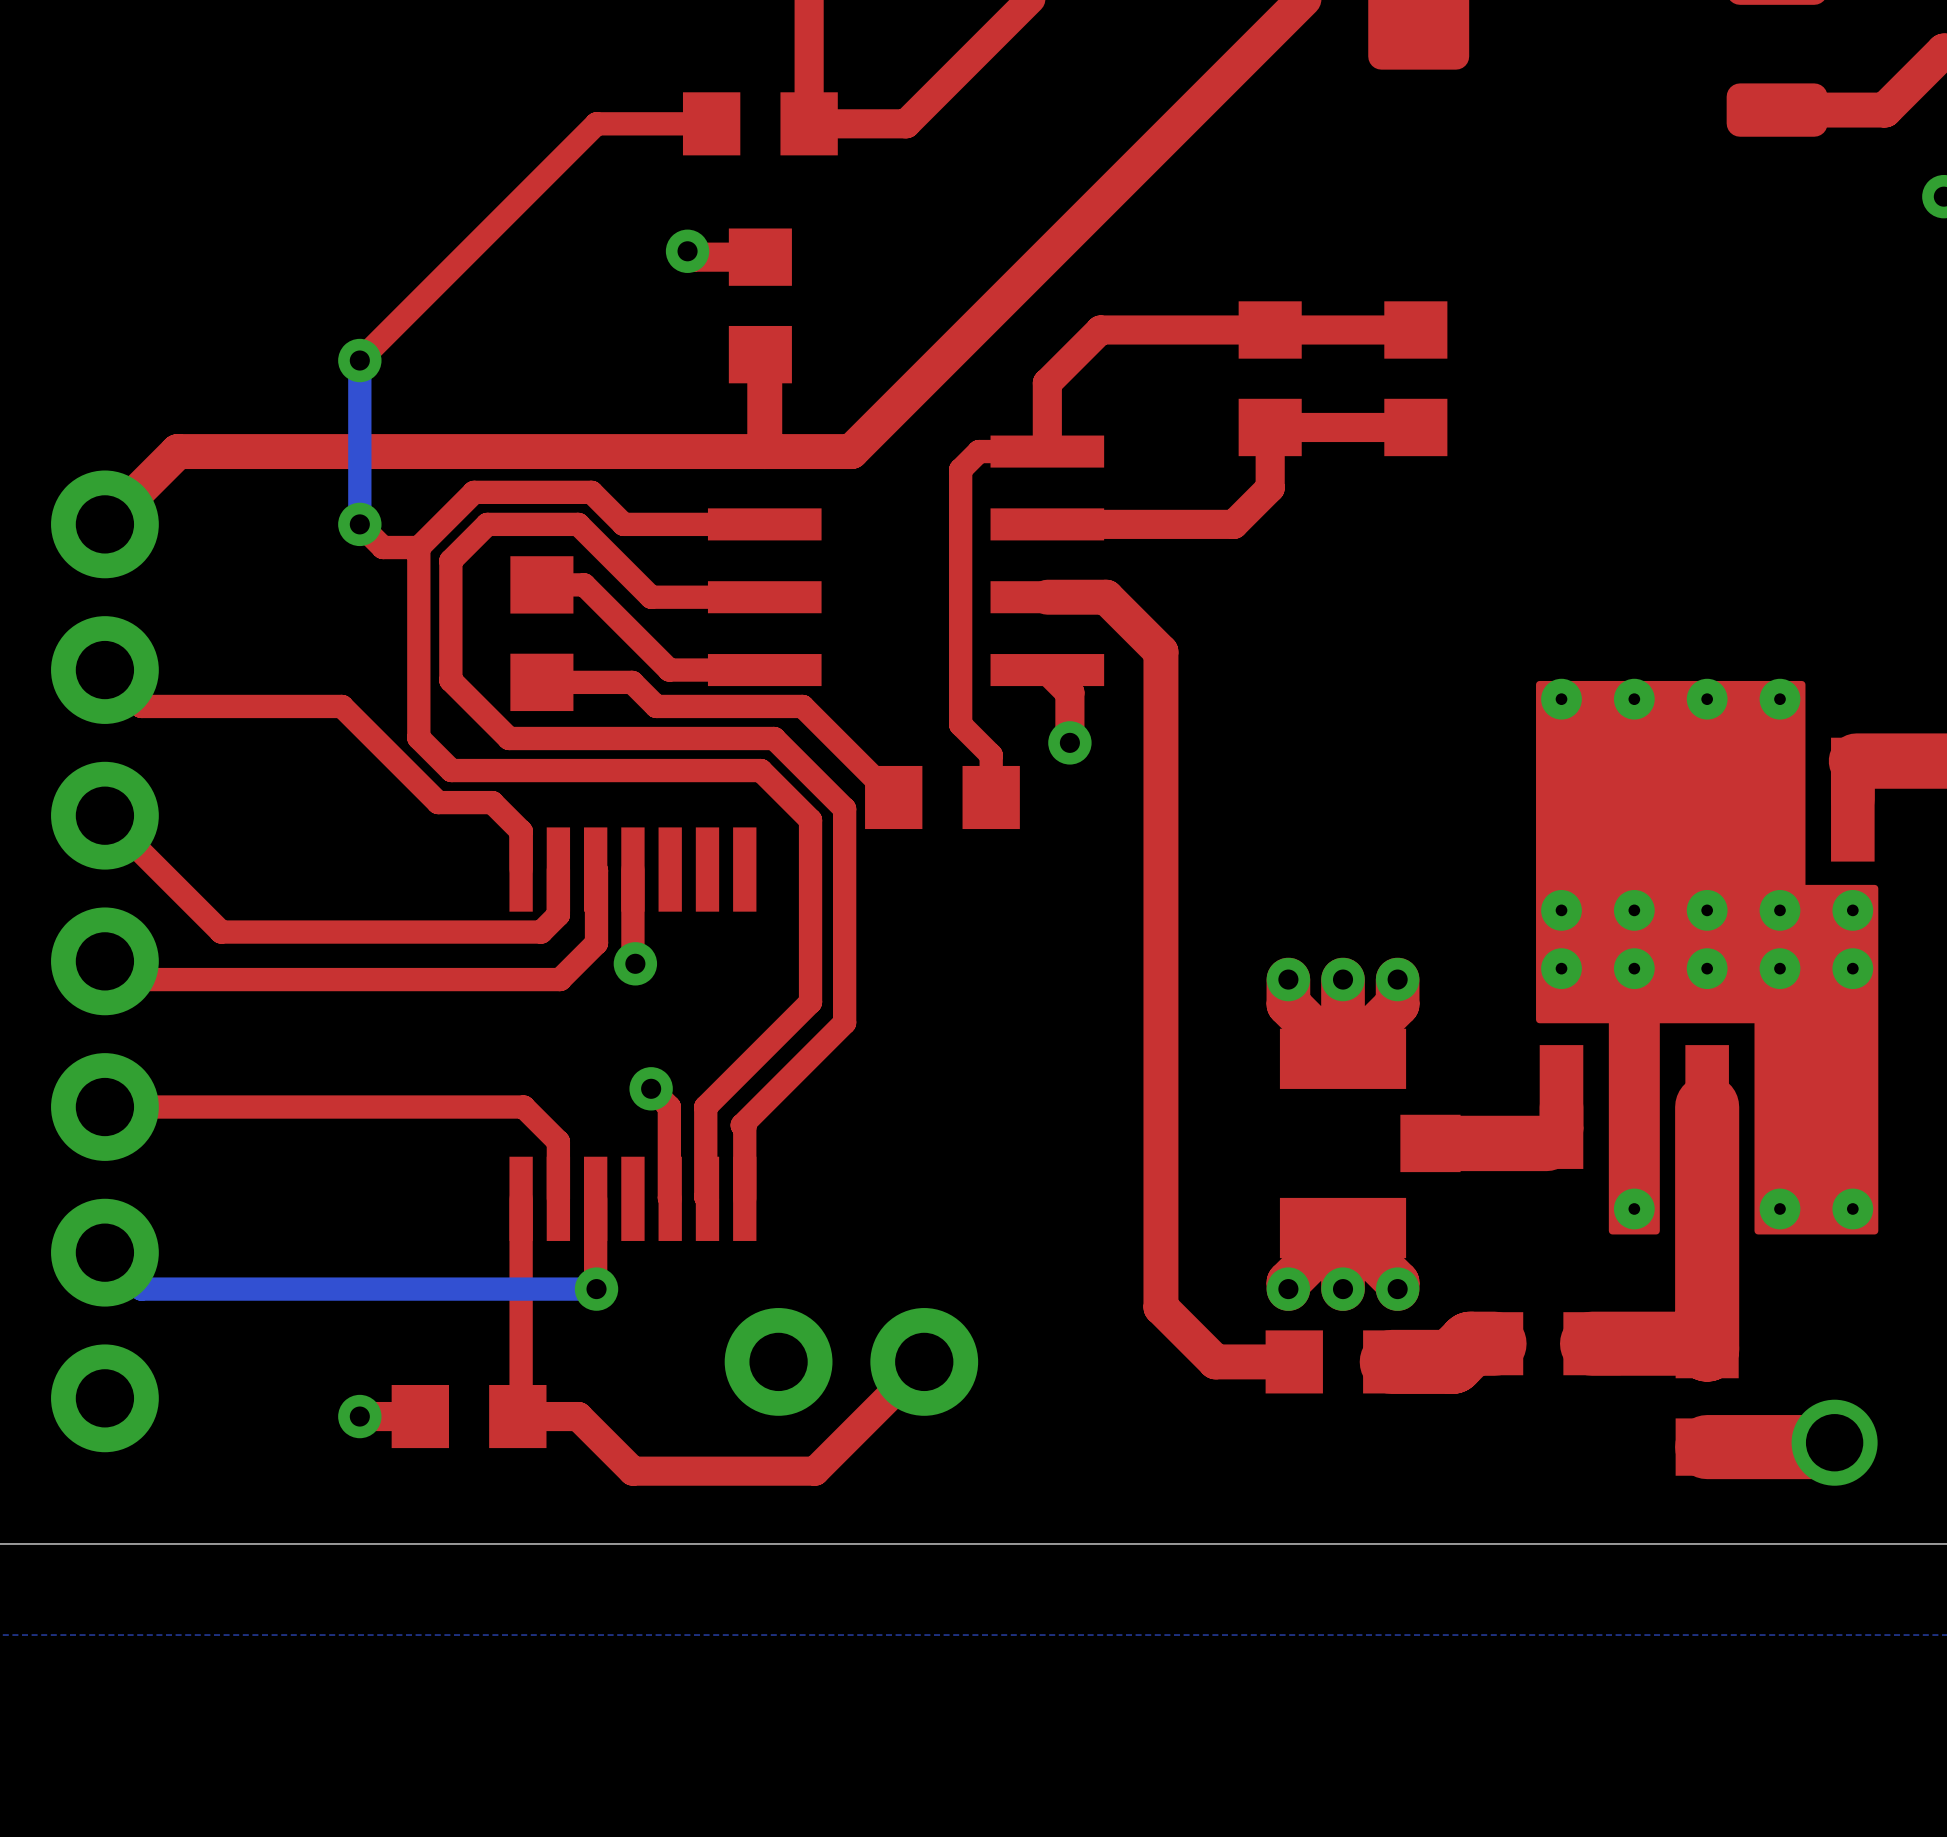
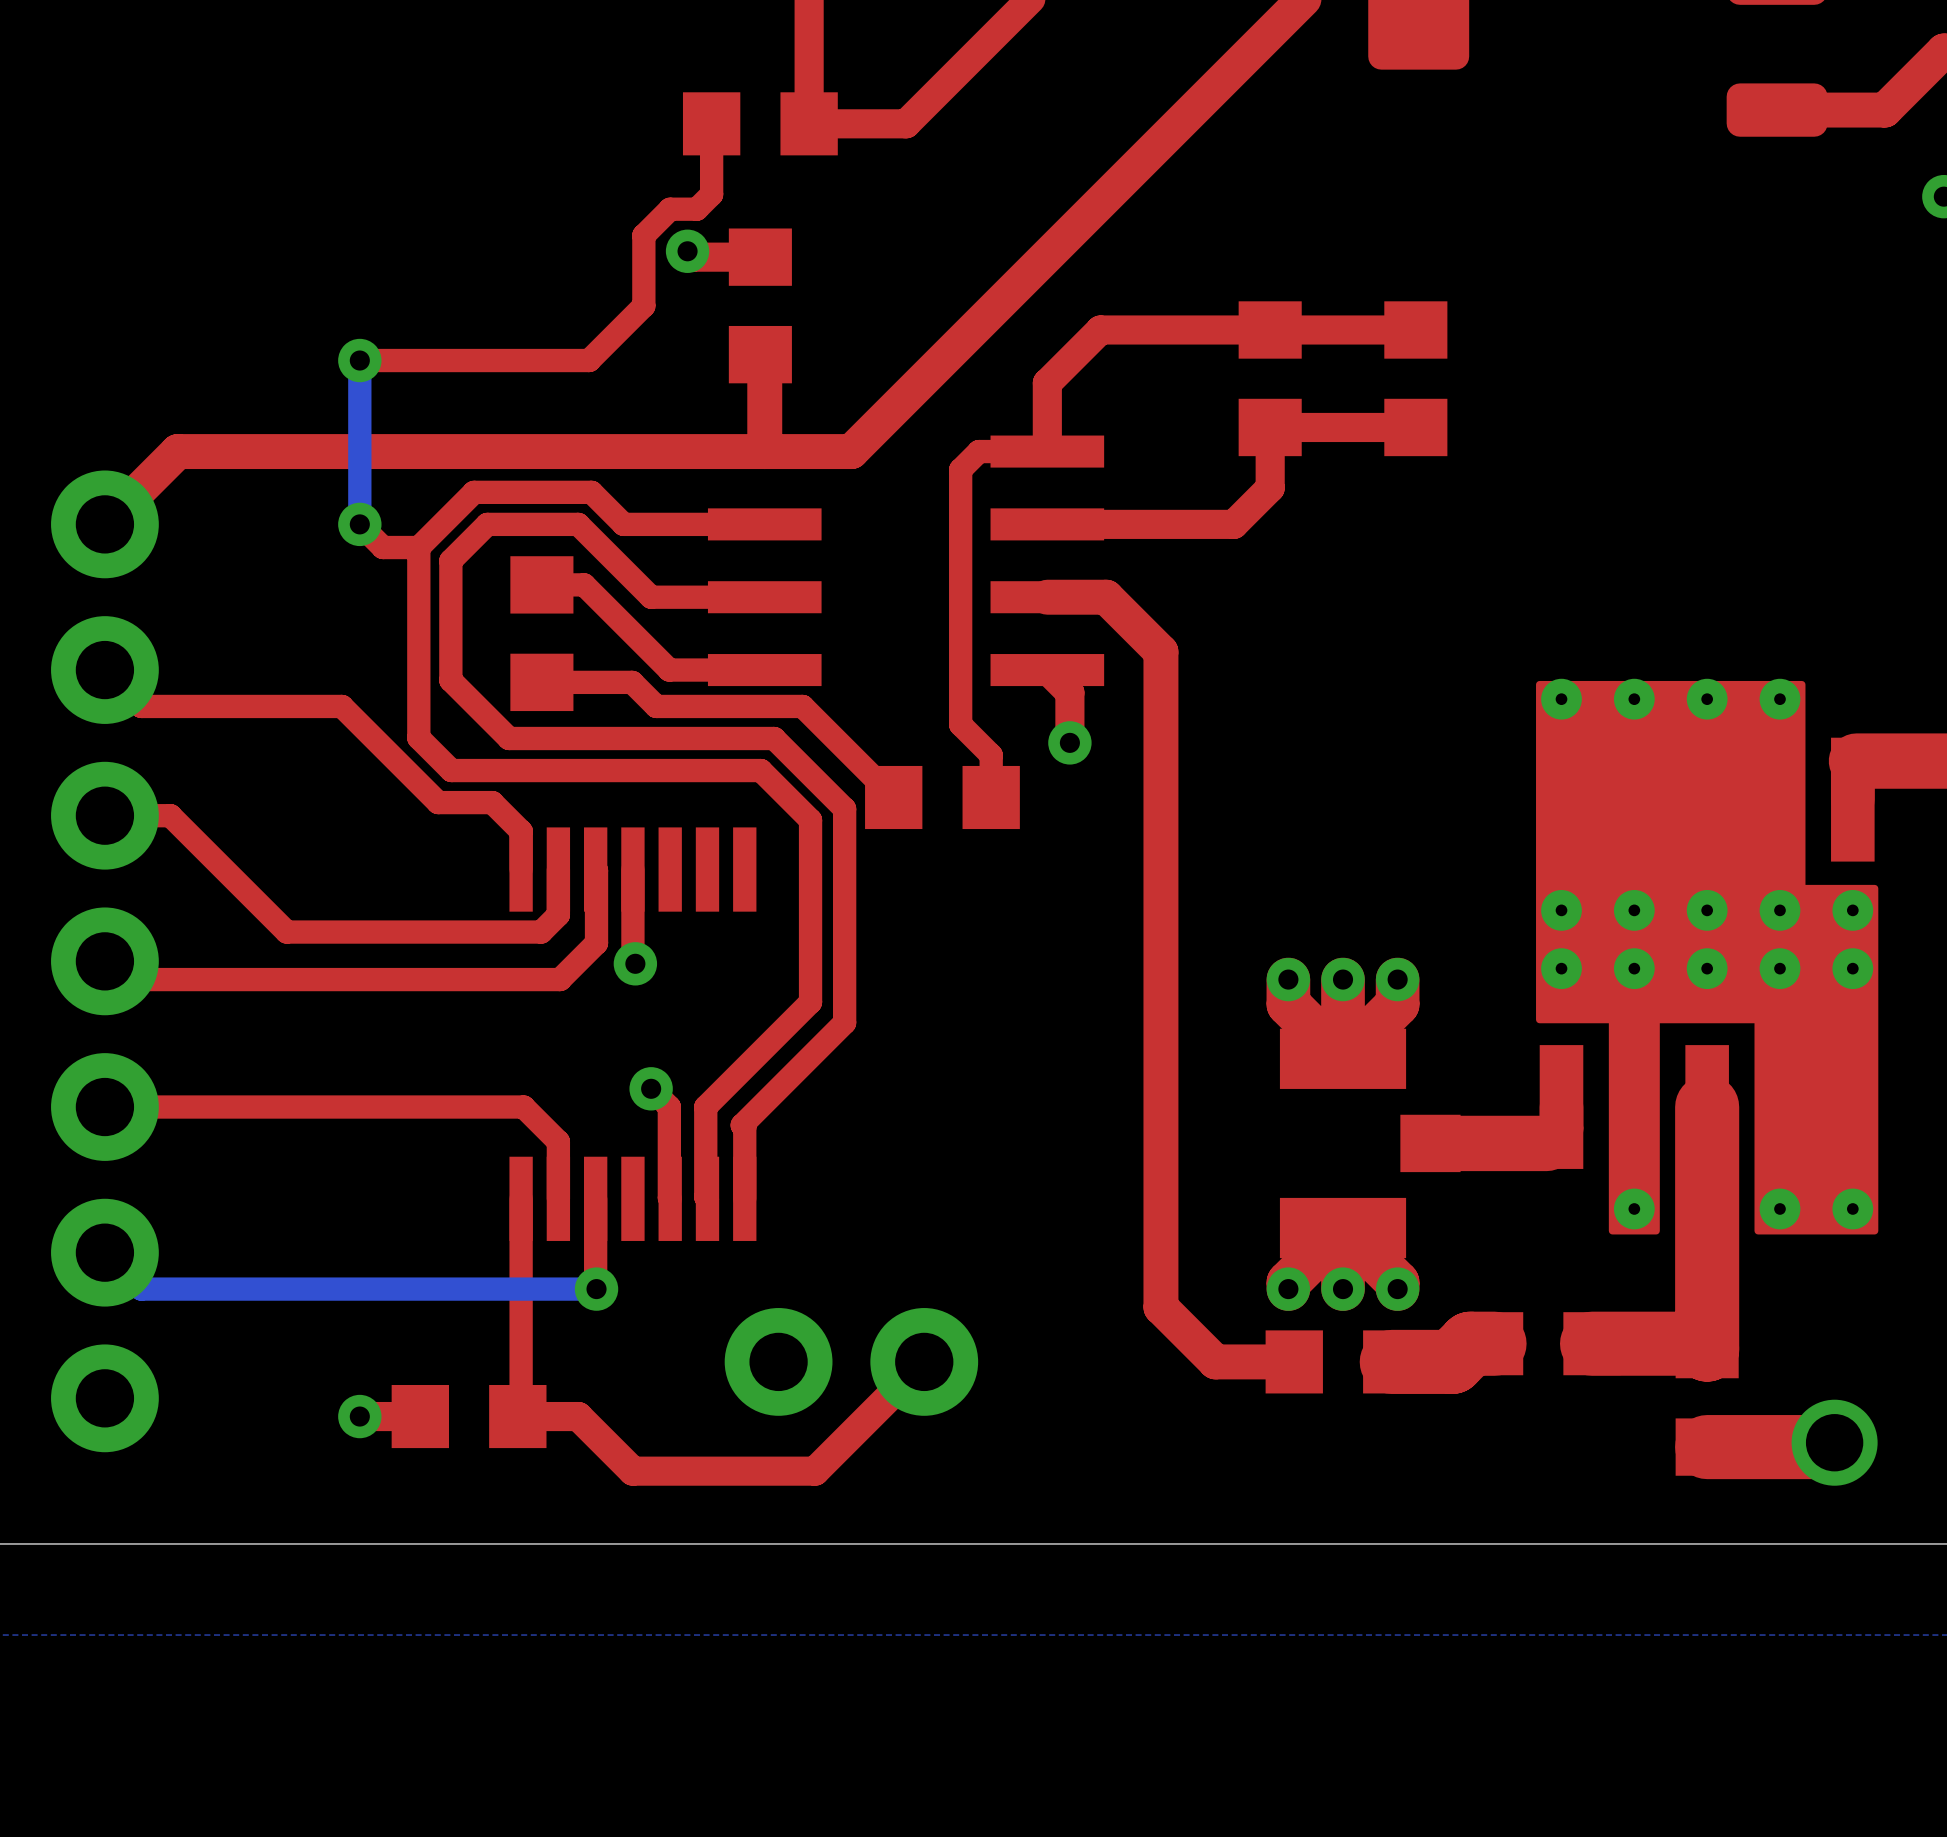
top track: (711, 123) (596, 123) (359, 360) -> (711, 123) (711, 194) (696, 209) (670, 209) (643, 235) (643, 305) (589, 360) (359, 360)
top track: (104, 815) (221, 932) (286, 932) -> (104, 815) (170, 815) (286, 932)

